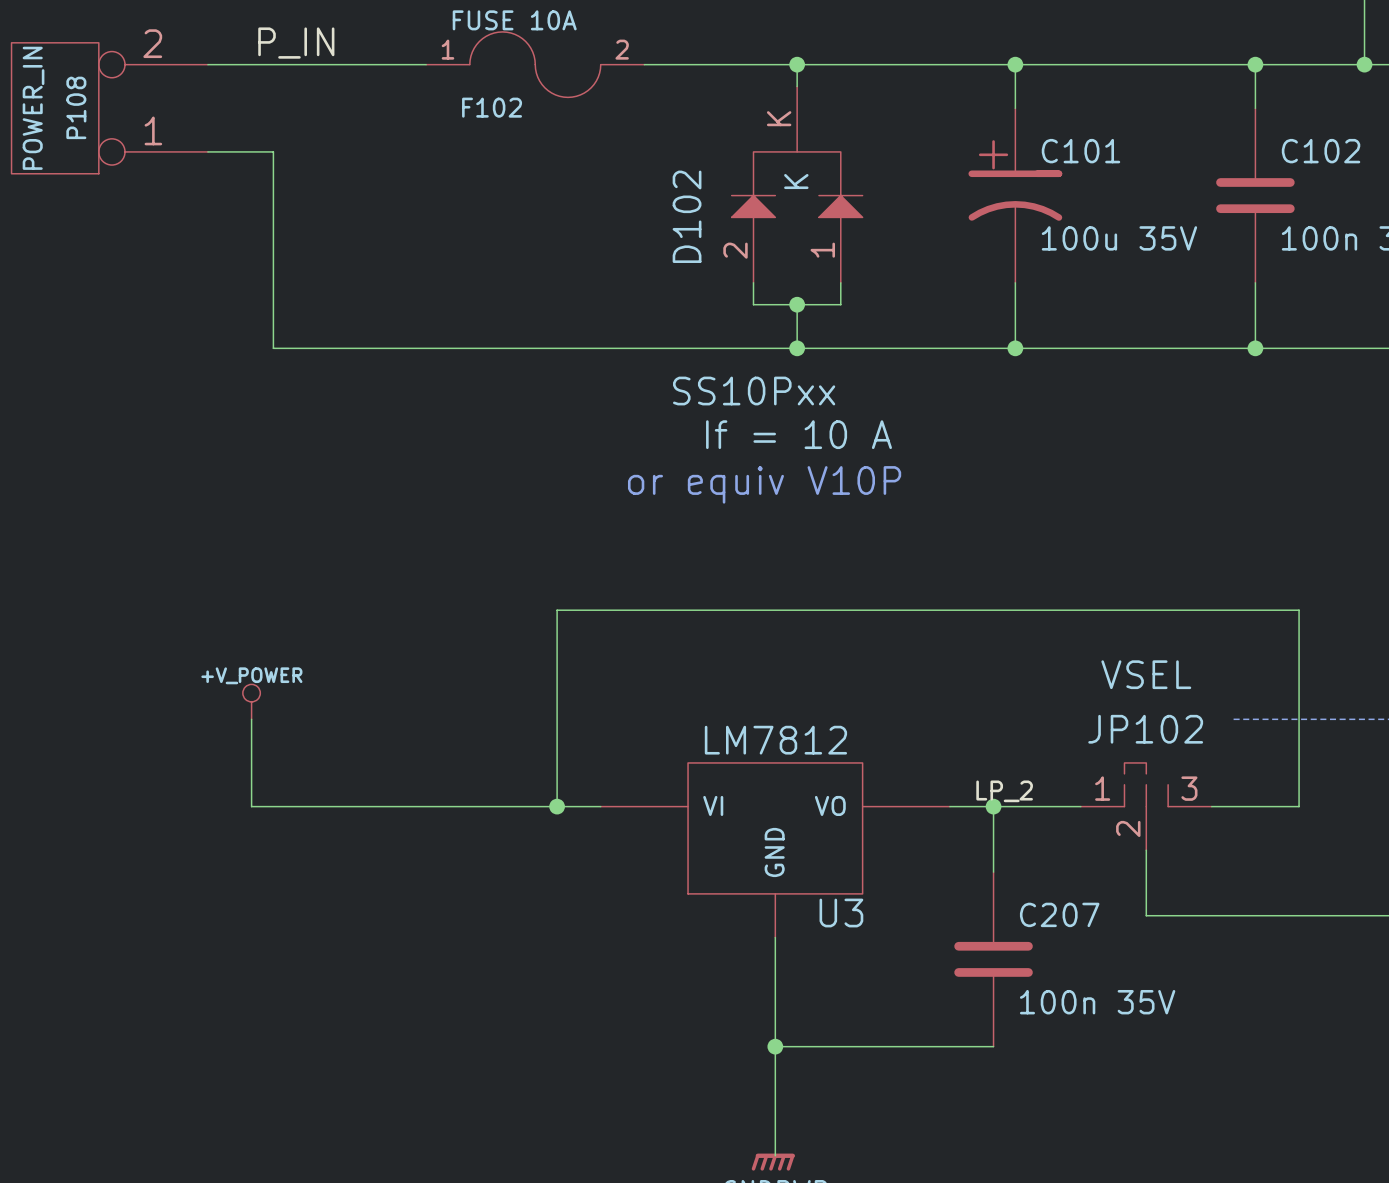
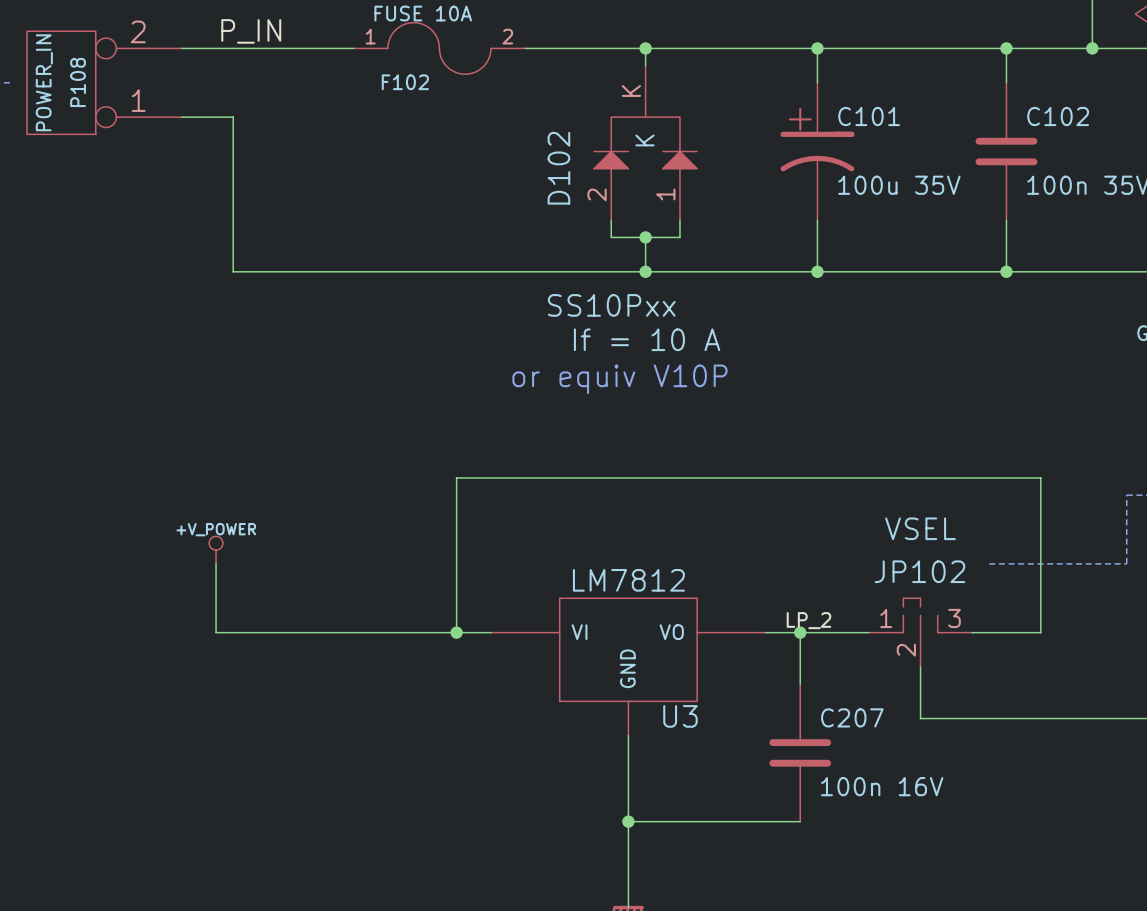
C207 value: 100n 35V (1097, 1002) -> 100n 16V (882, 786)

